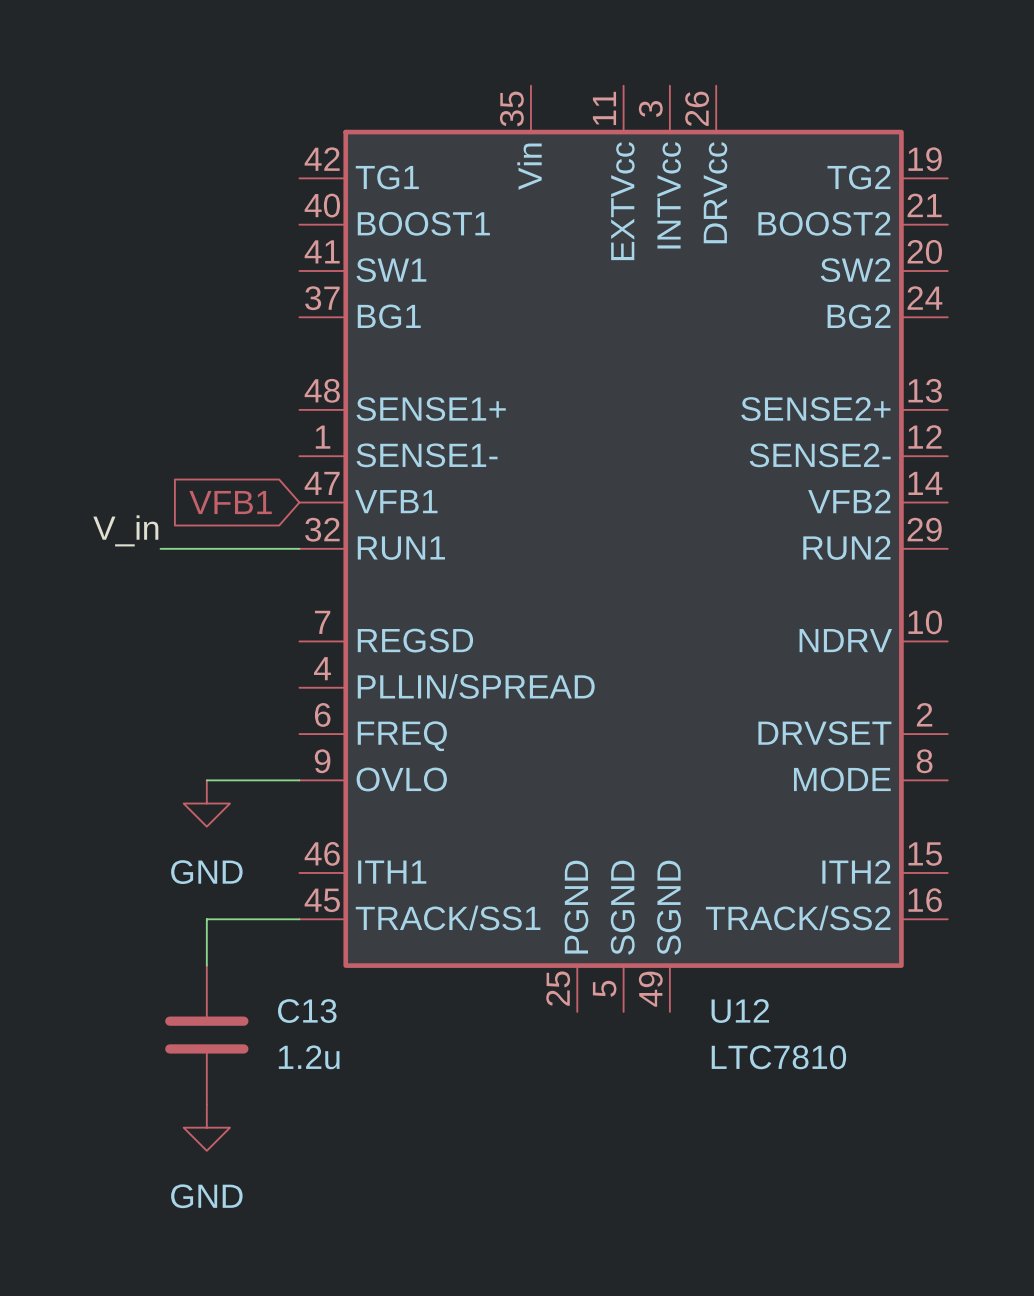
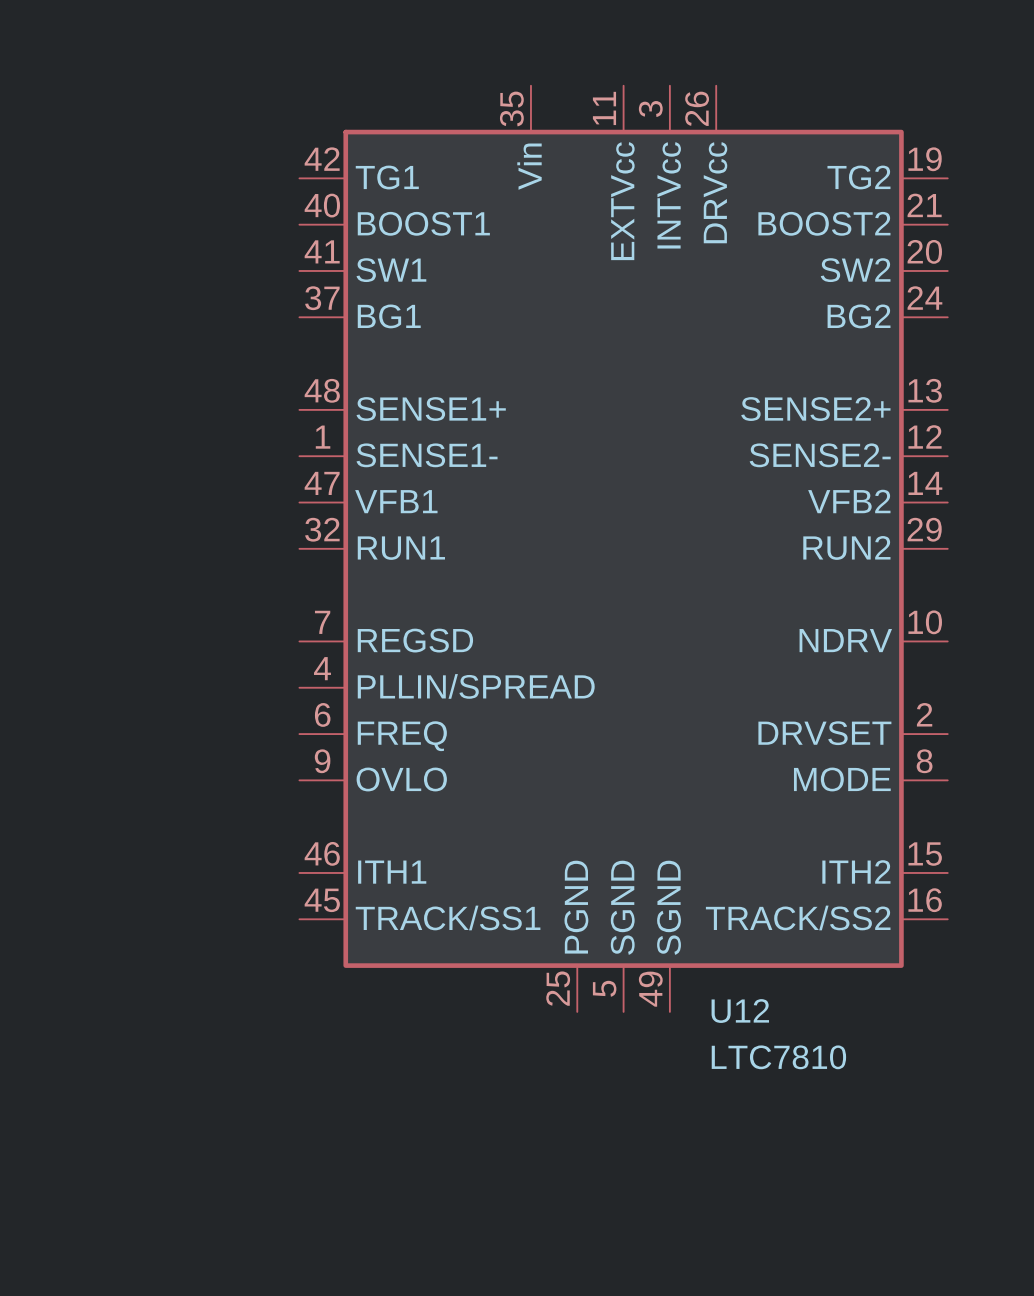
global label: VFB1 (230, 502) -> none
label: V_in (125, 530) -> none
wire: (160, 548) (299, 548) -> none
wire: (206, 780) (299, 780) -> none
power symbol: GND (206, 803) -> none
wire: (299, 919) (206, 919) (206, 965) -> none
C13: 1.2u (206, 1035) -> none
power symbol: GND (206, 1127) -> none

